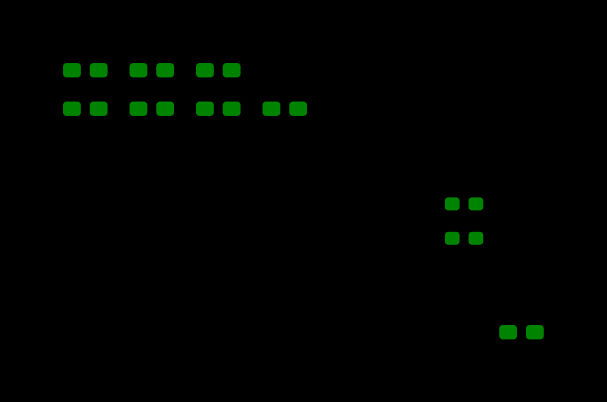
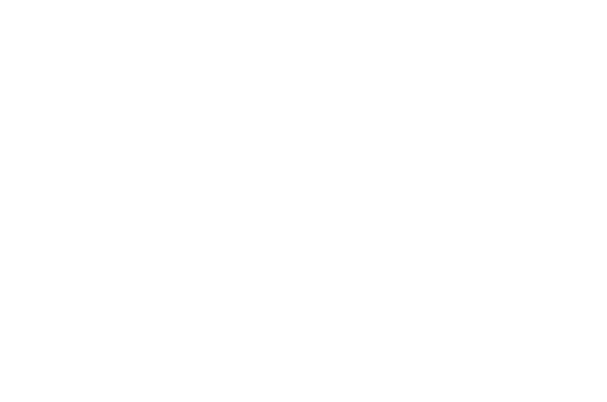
part: (85, 70) -> none
part: (151, 70) -> none
part: (218, 70) -> none
part: (85, 108) -> none
part: (151, 108) -> none
part: (218, 108) -> none
part: (284, 108) -> none
part: (464, 203) -> none
part: (464, 238) -> none
part: (521, 332) -> none

